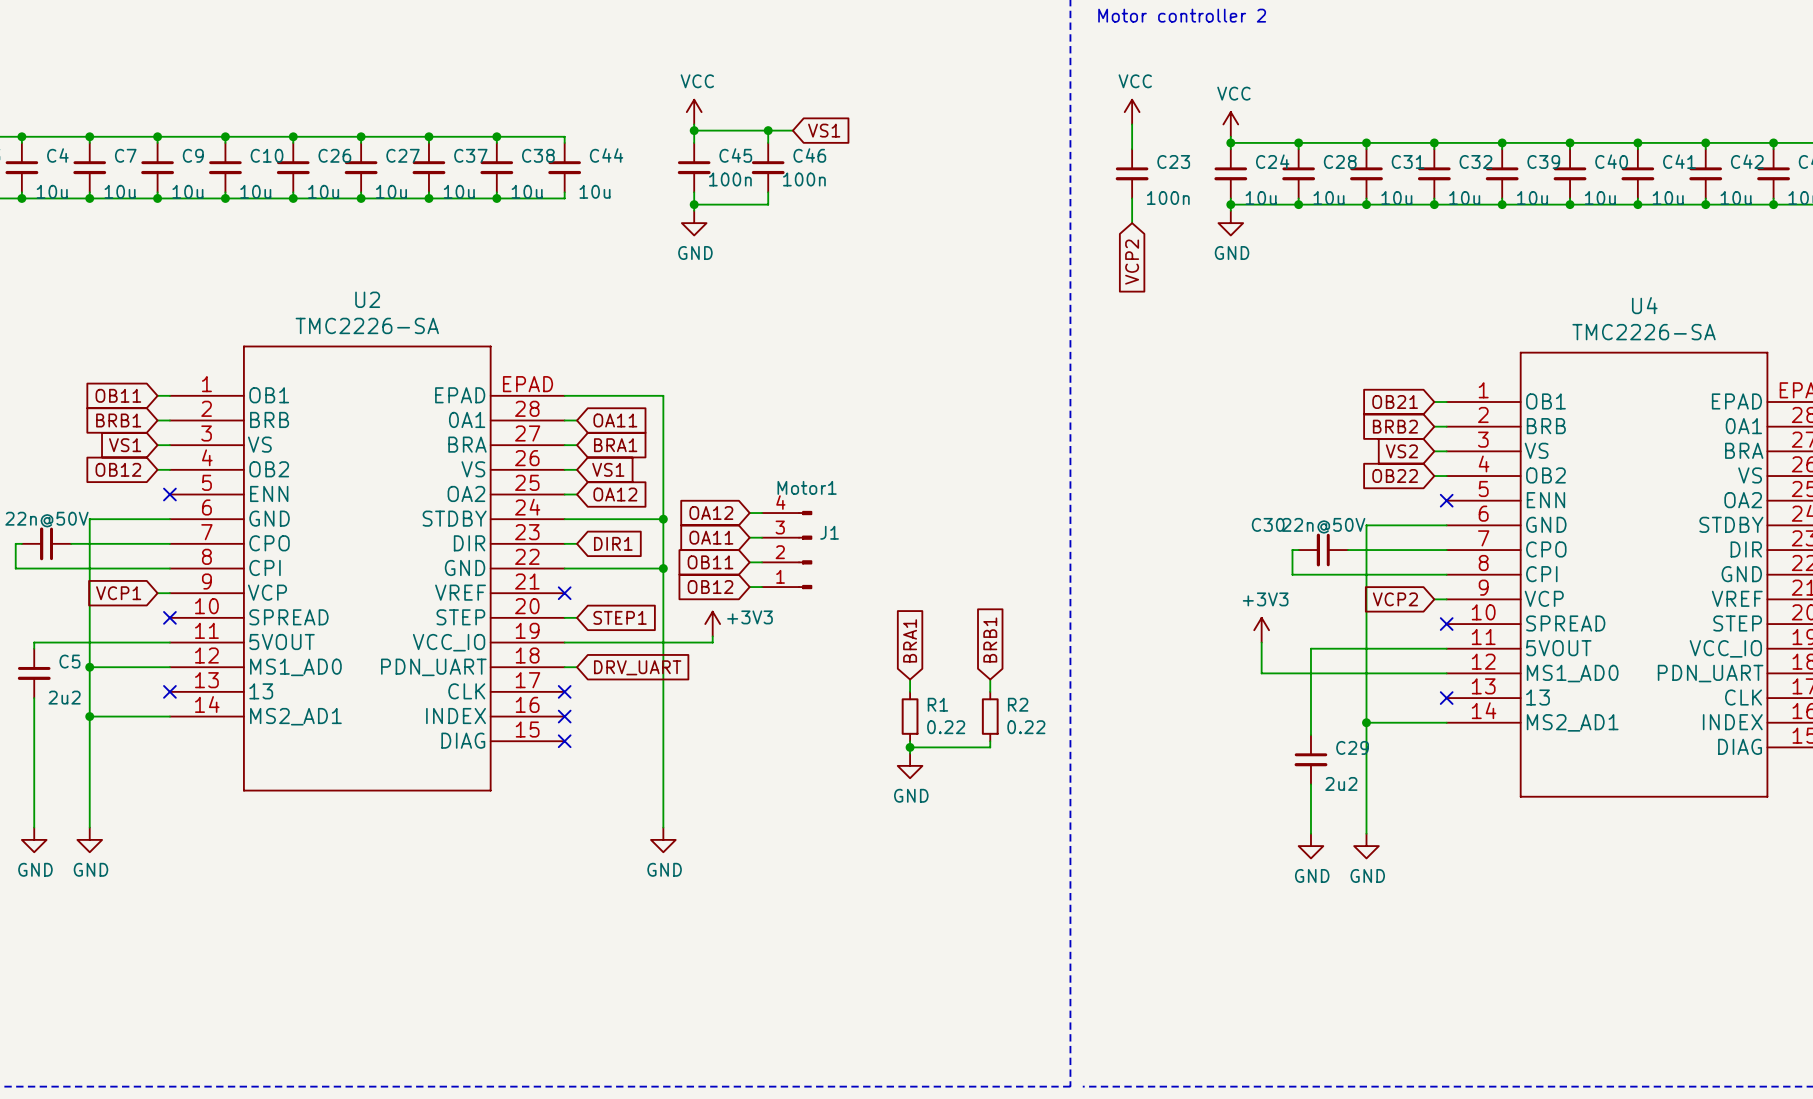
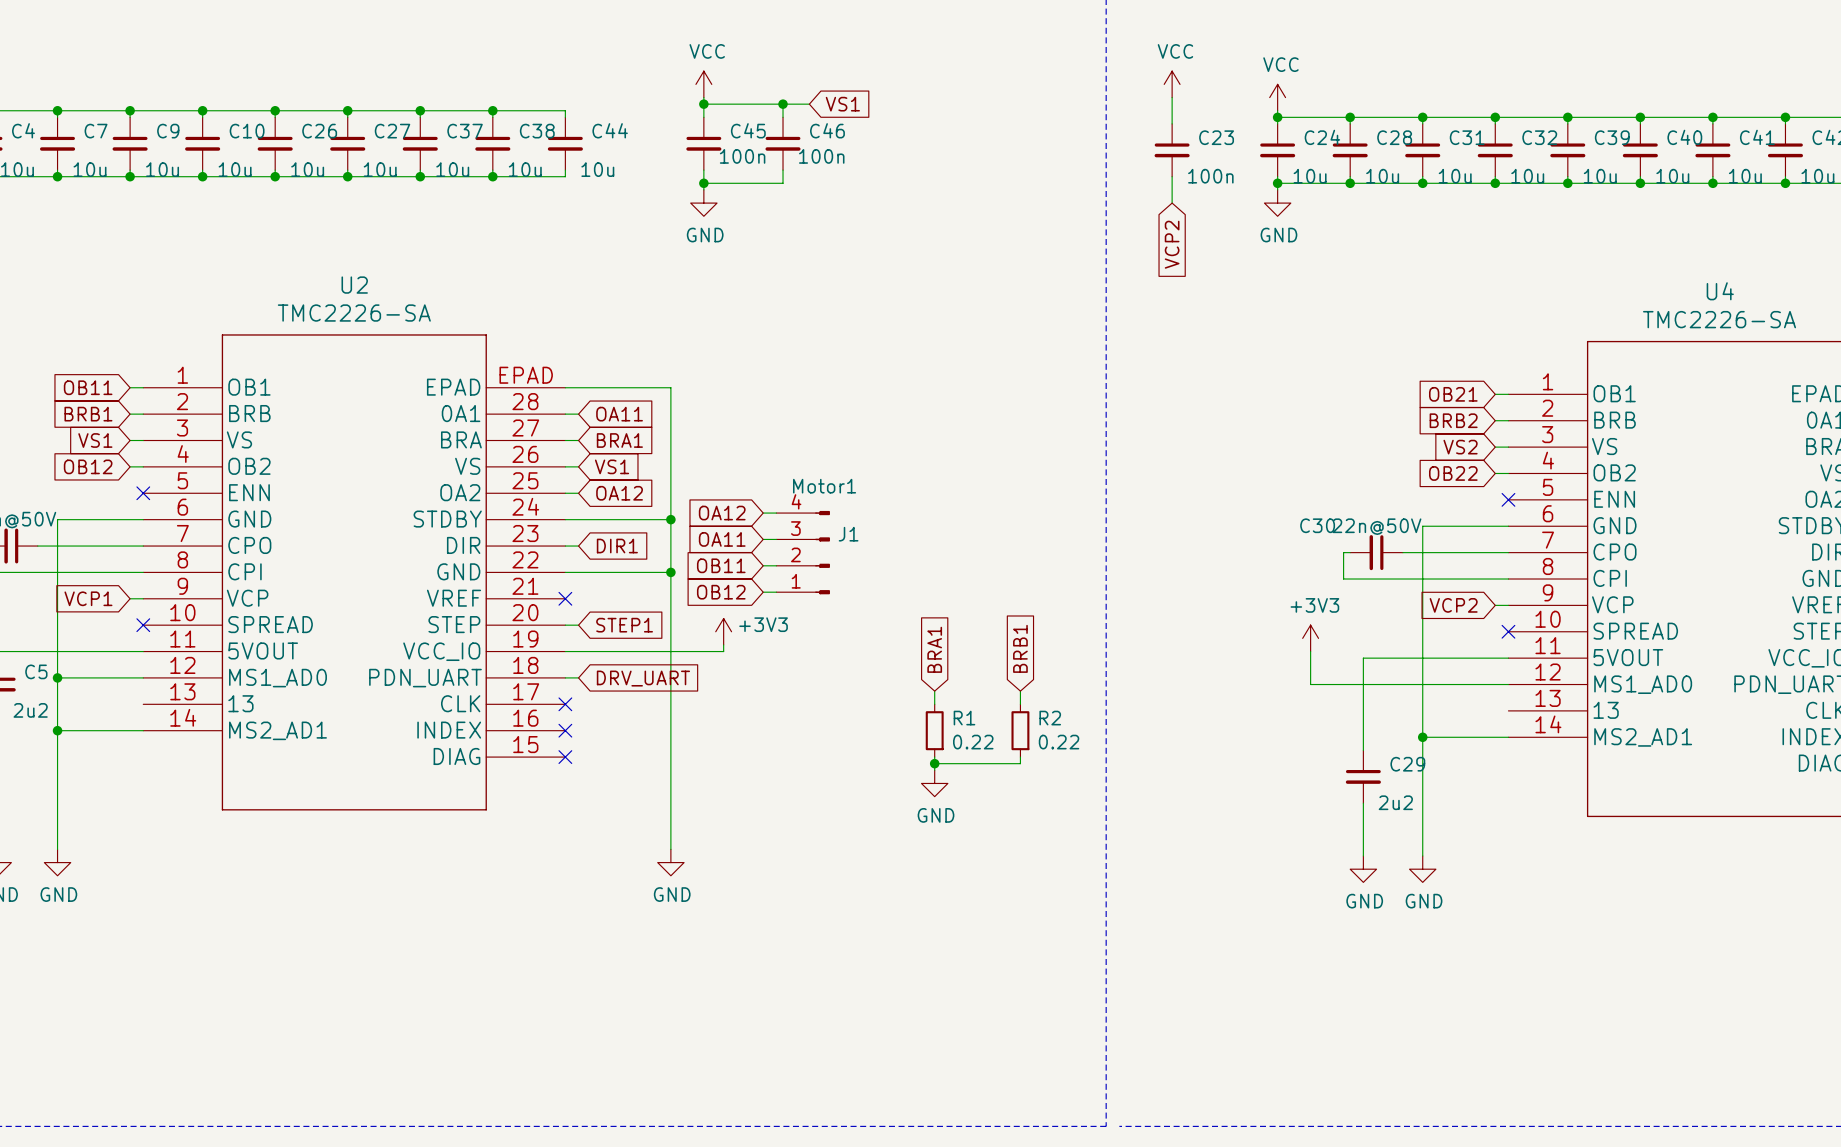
no-connect mark: (169, 691) -> none
no-connect mark: (1446, 698) -> none

